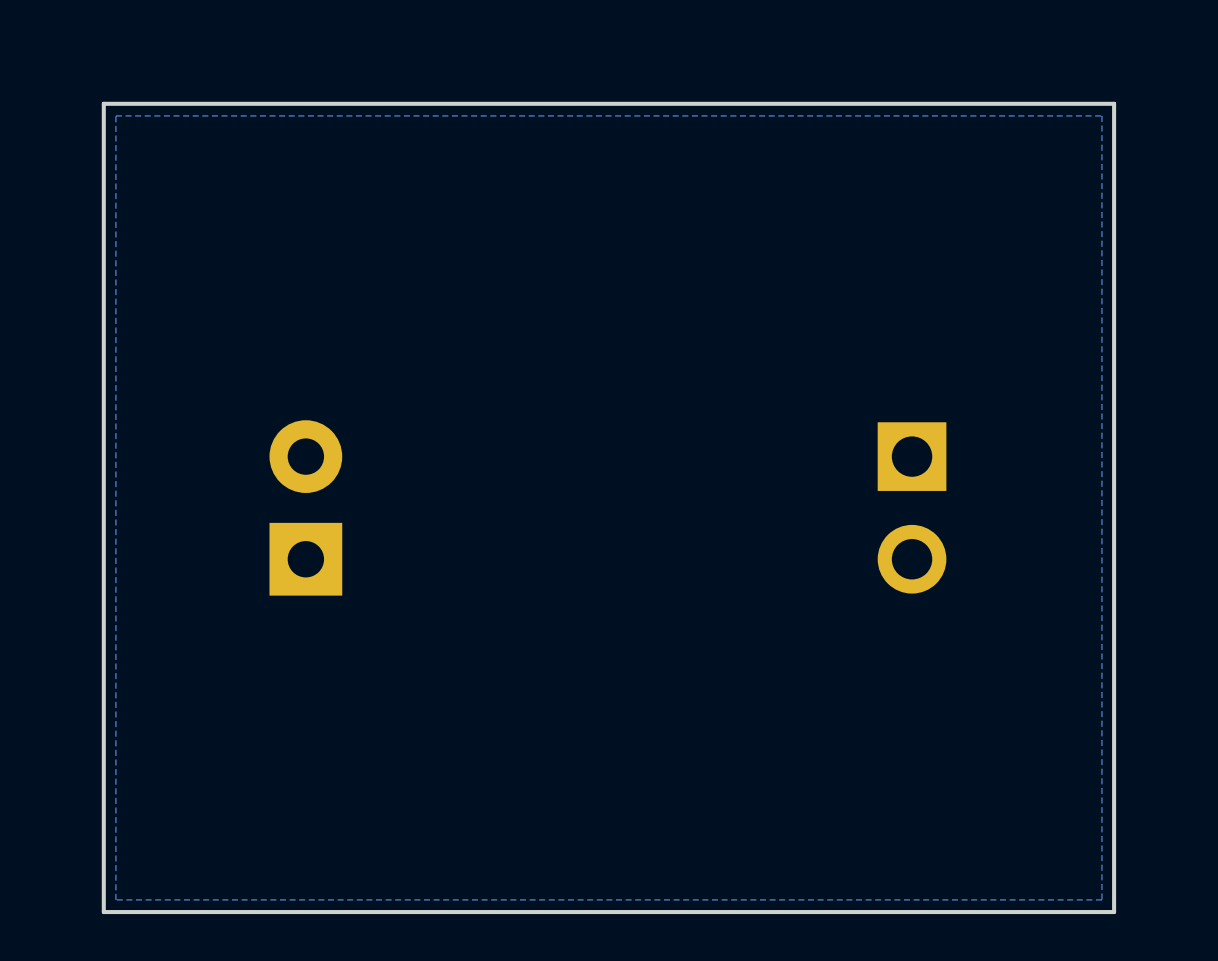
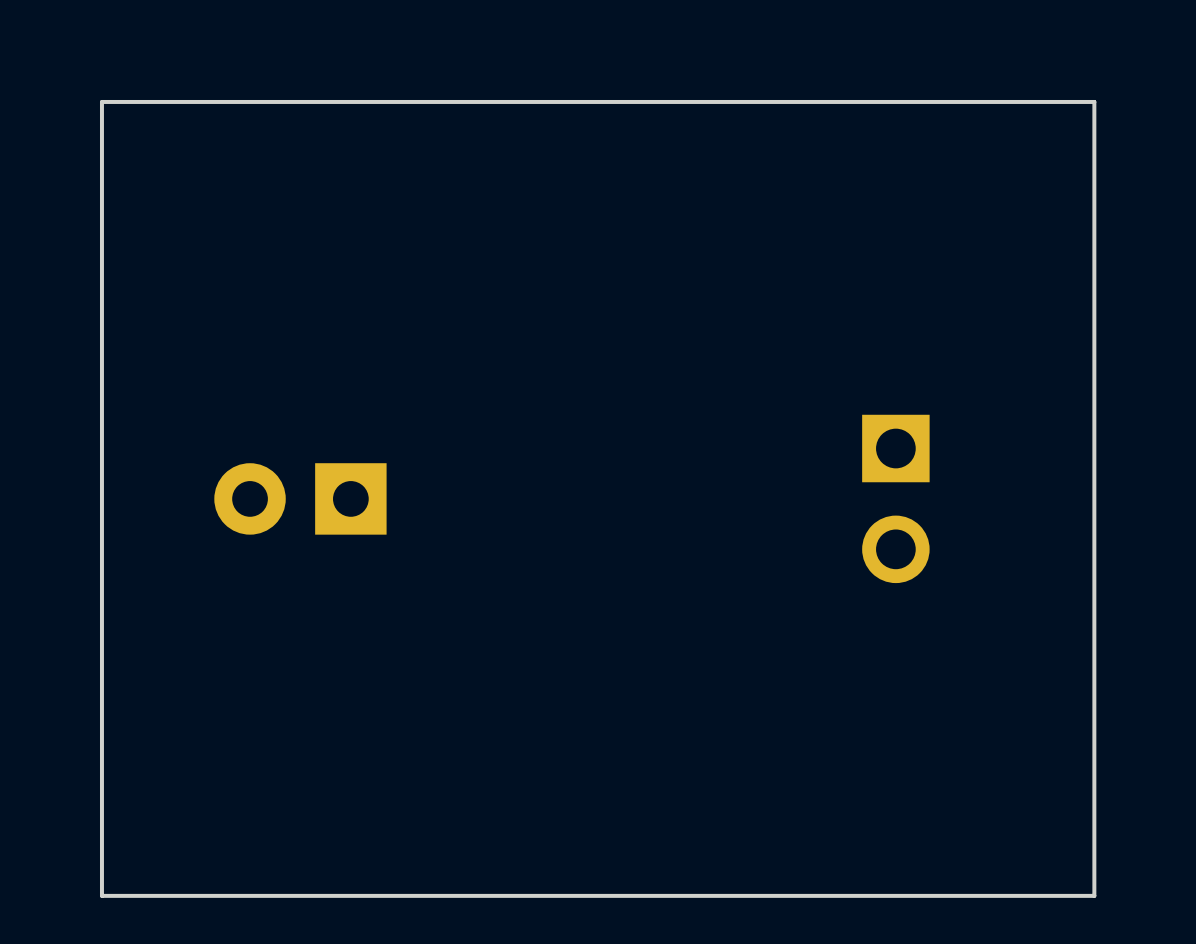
zone outline: (1101, 115) (1101, 899) (115, 899) (115, 115) (1101, 115) -> none
part rotation: 0° (305, 507) -> 90° counterclockwise (300, 498)

